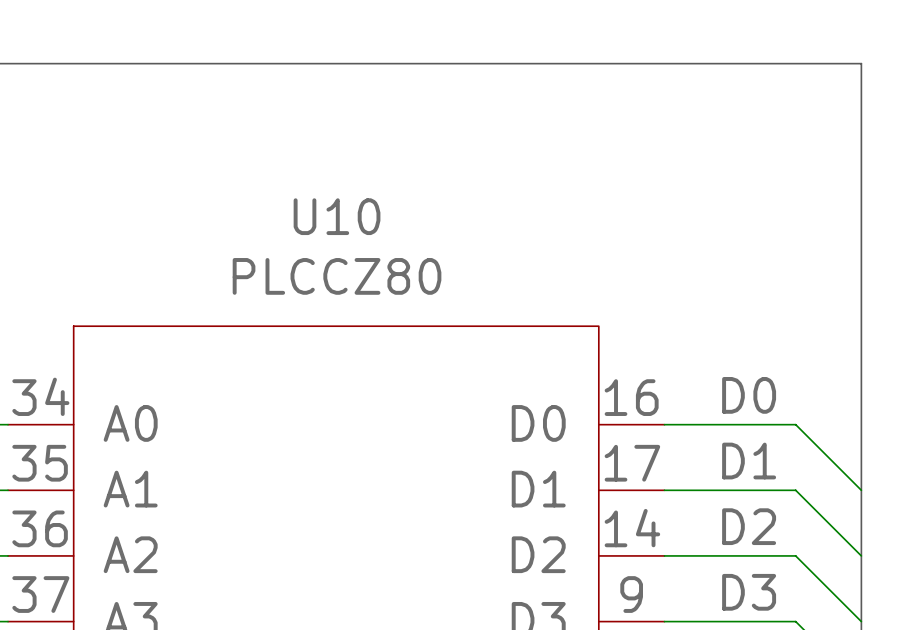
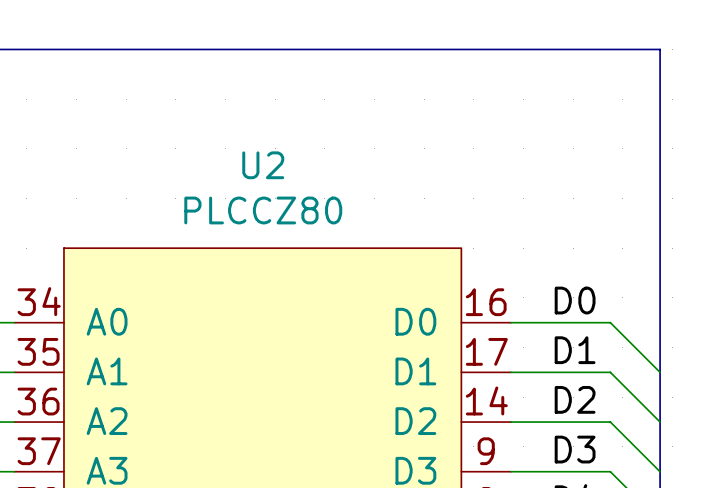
U10 name: U10 (337, 216) -> U2 (263, 165)

